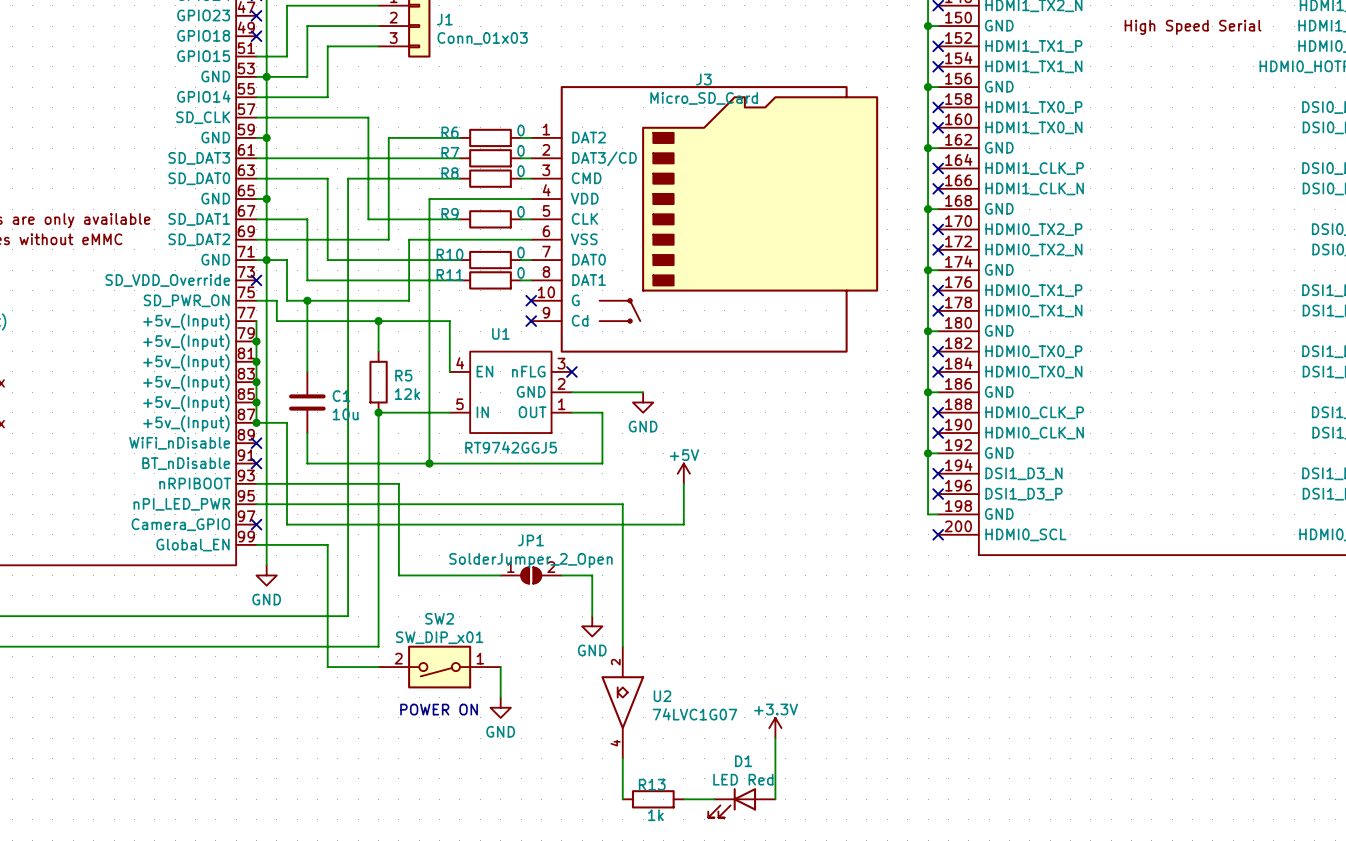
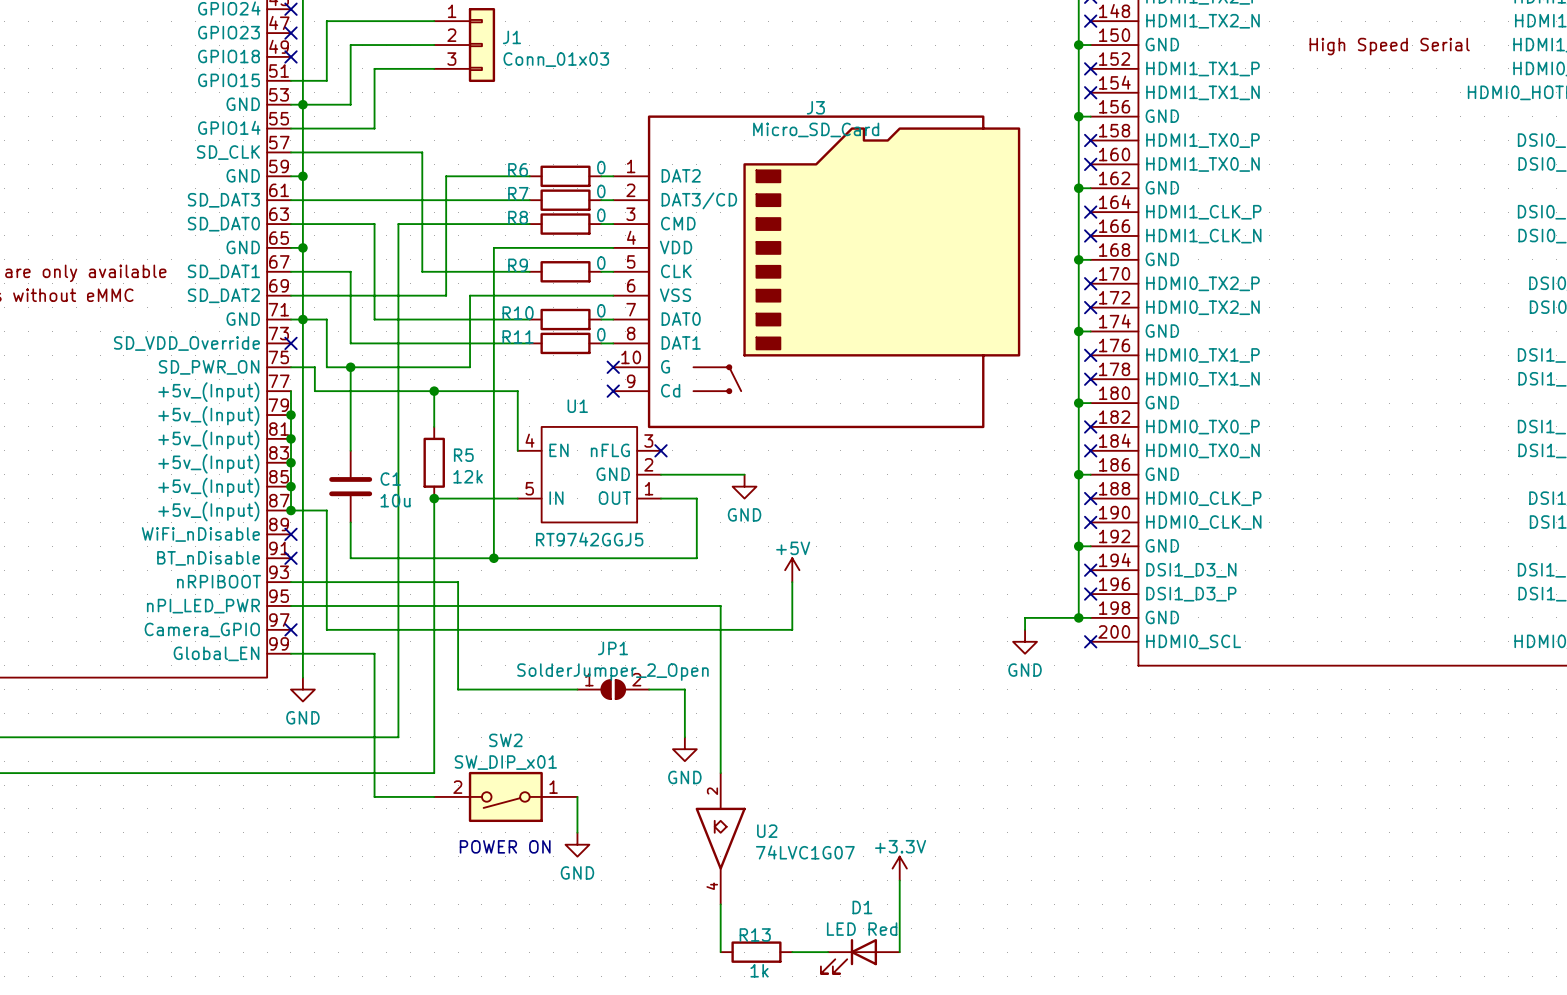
wire: none -> (1078, 617) (1025, 617) (1025, 629)
junction: none -> (1078, 617)
power symbol: none -> GND (1025, 641)

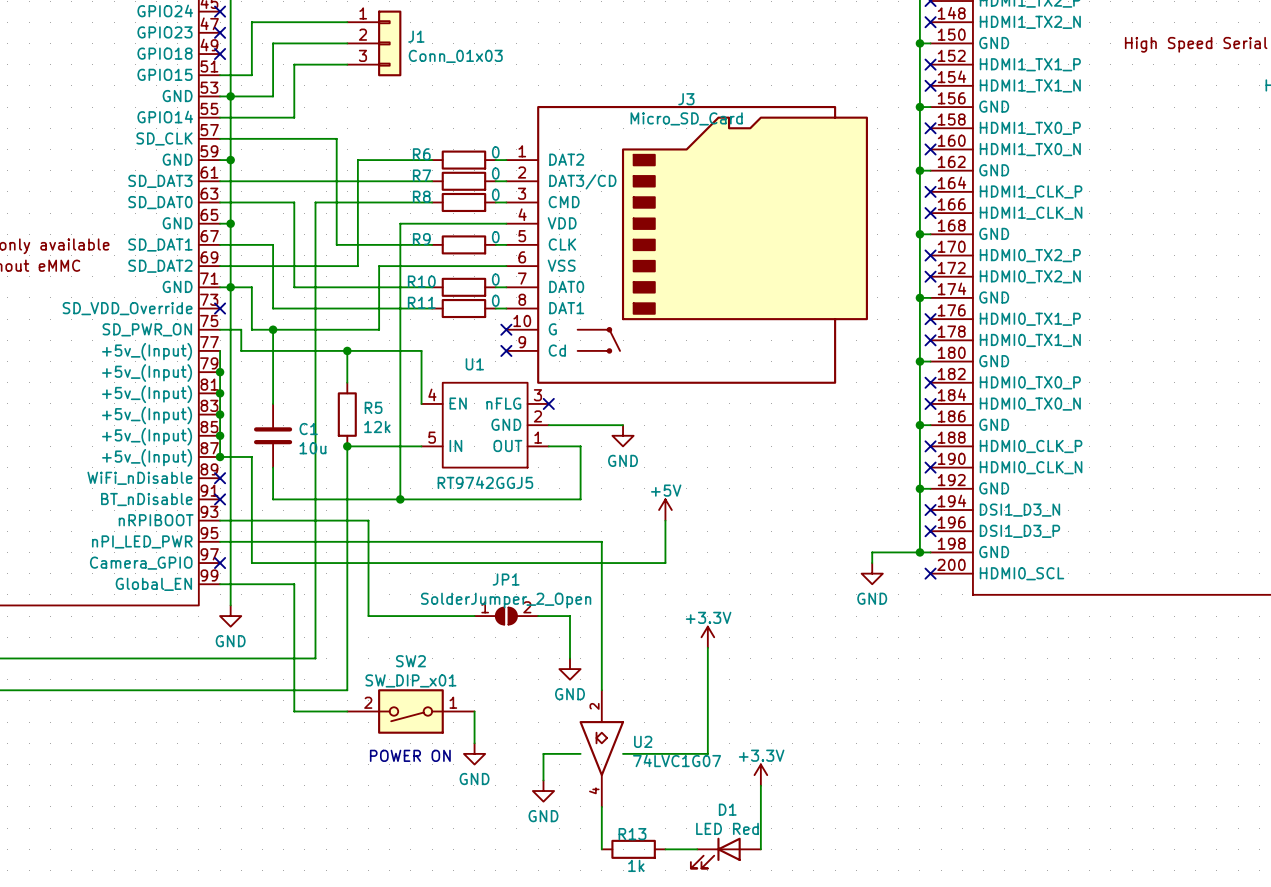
power symbol: none -> +3.3V (707, 637)
wire: none -> (707, 647) (707, 753) (623, 753)
wire: none -> (580, 753) (543, 753) (543, 780)
power symbol: none -> GND (543, 791)

